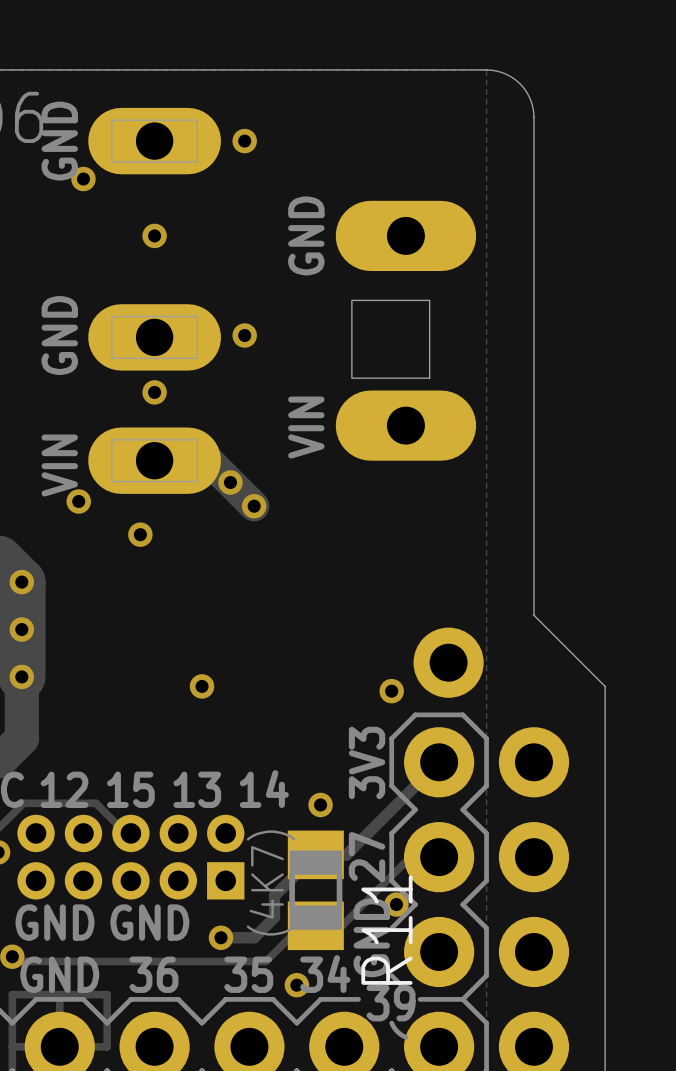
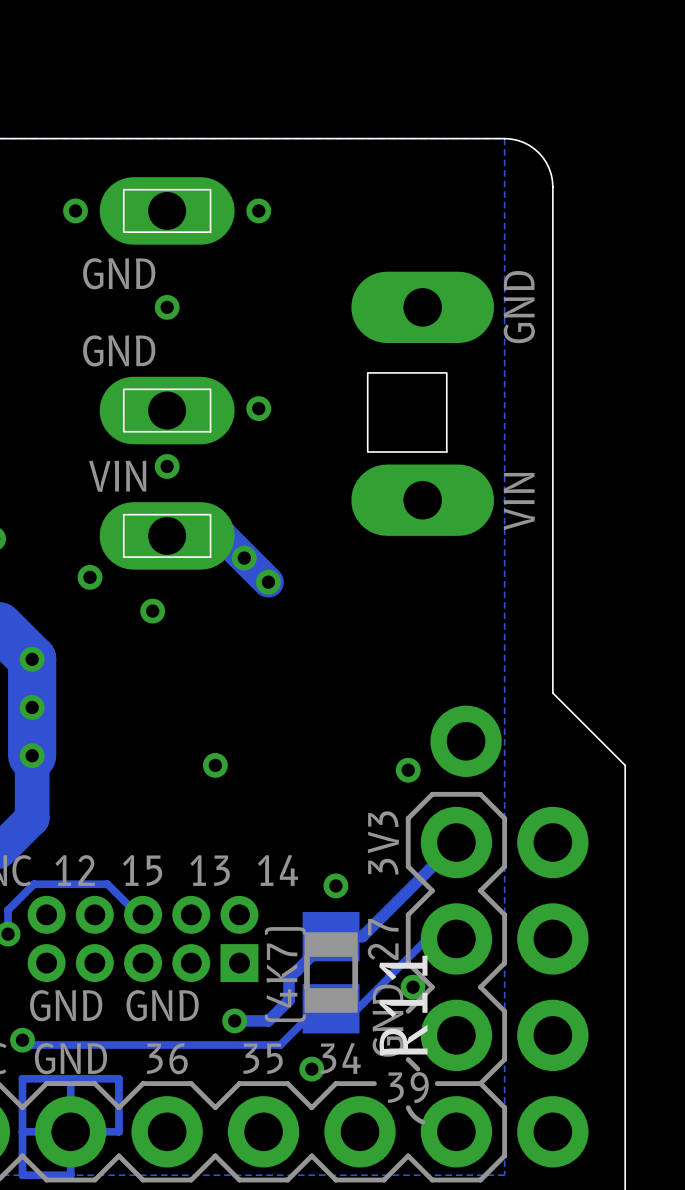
text rotation: 0° (59, 141) -> 90° clockwise (119, 273)
via position: (83, 179) -> (75, 210)
text: GND (306, 235) -> none
text: none -> GND (519, 307)
text rotation: 0° (59, 335) -> 90° clockwise (119, 350)
text: VIN (306, 427) -> none
text: none -> VIN (519, 501)
text rotation: 0° (59, 465) -> 90° clockwise (117, 476)

